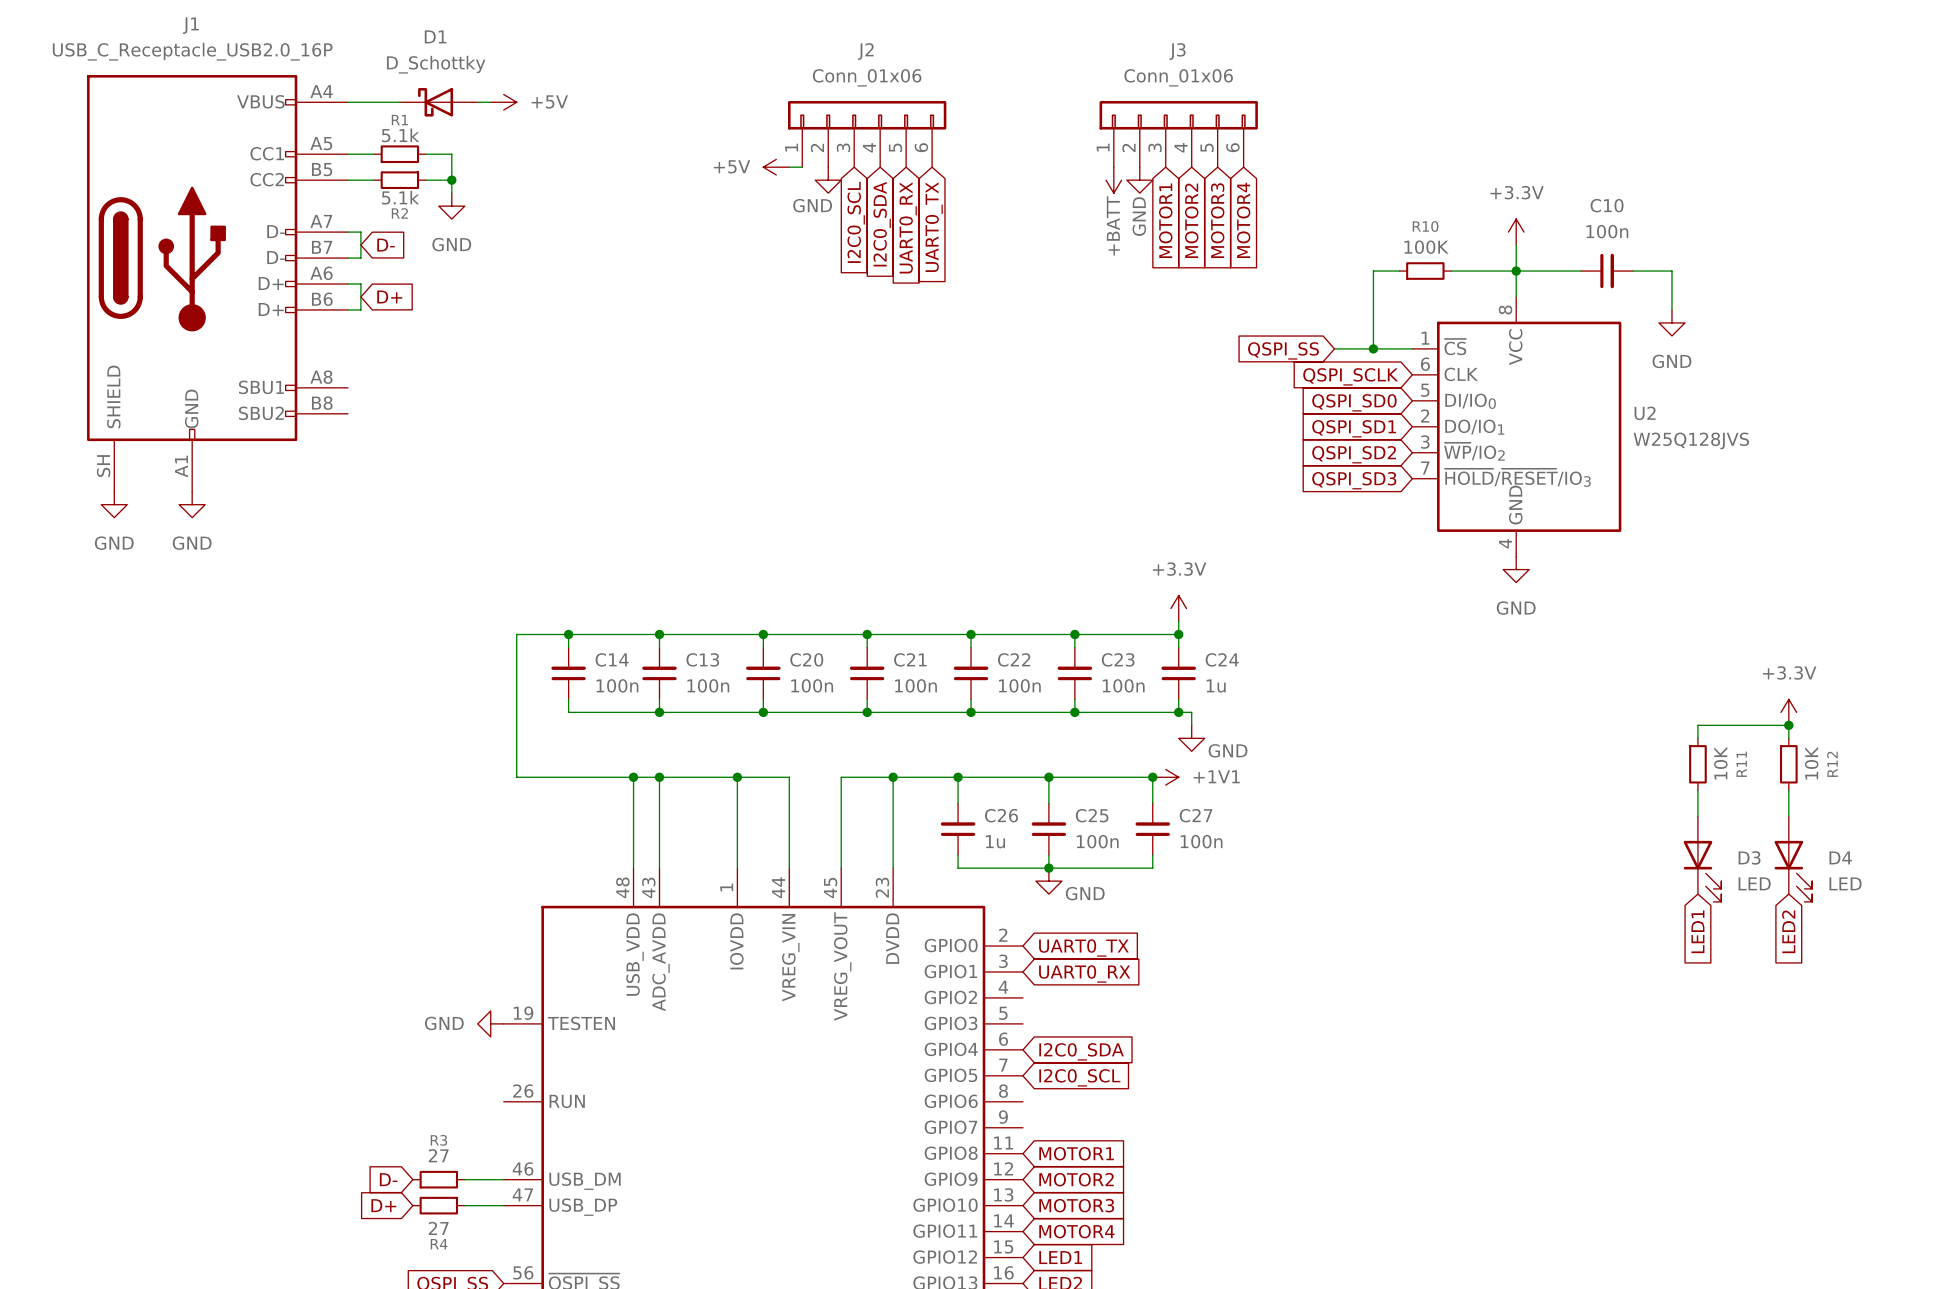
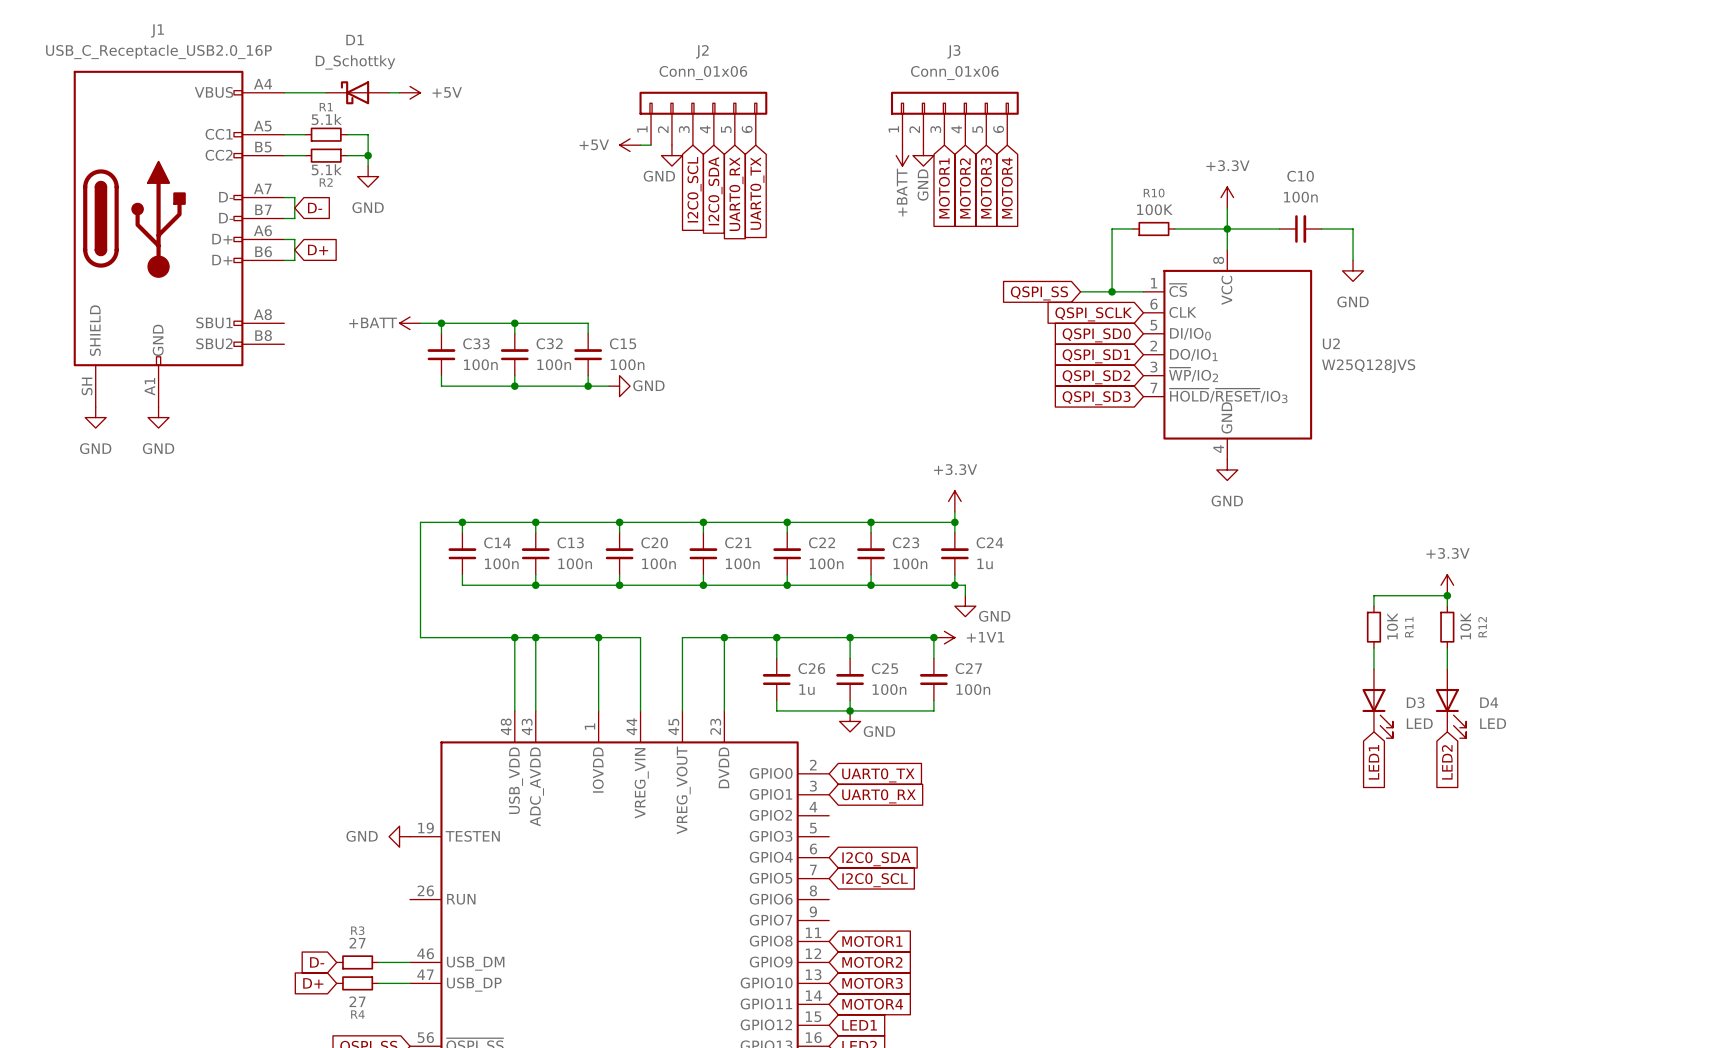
power symbol: none -> +BATT (410, 323)
wire: none -> (420, 323) (588, 323) (588, 333)
wire: none -> (441, 323) (441, 333)
junction: none -> (441, 323)
wire: none -> (514, 323) (514, 333)
junction: none -> (514, 323)
C33: none -> 100n (441, 354)
C32: none -> 100n (514, 354)
C15: none -> 100n (588, 354)
wire: none -> (441, 375) (441, 386) (609, 386)
wire: none -> (514, 375) (514, 386)
wire: none -> (588, 375) (588, 386)
junction: none -> (514, 386)
junction: none -> (588, 386)
power symbol: none -> GND (619, 386)

